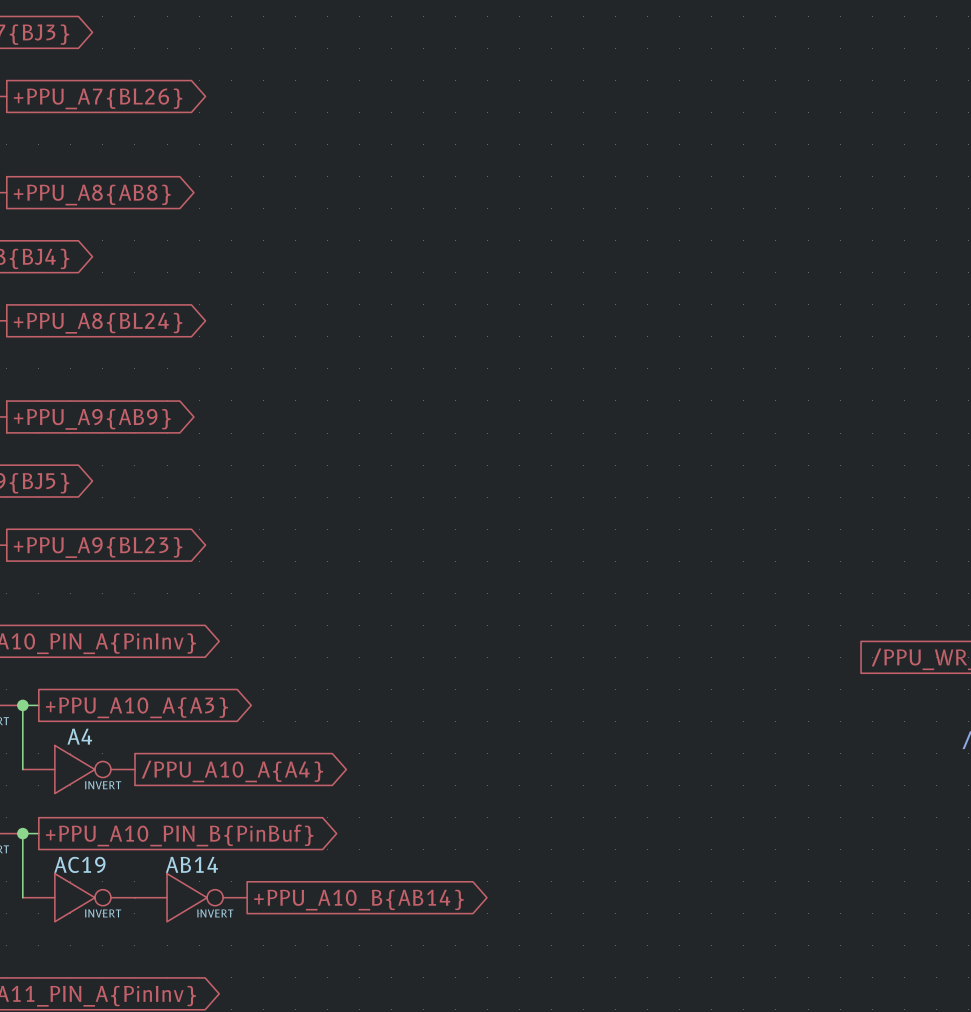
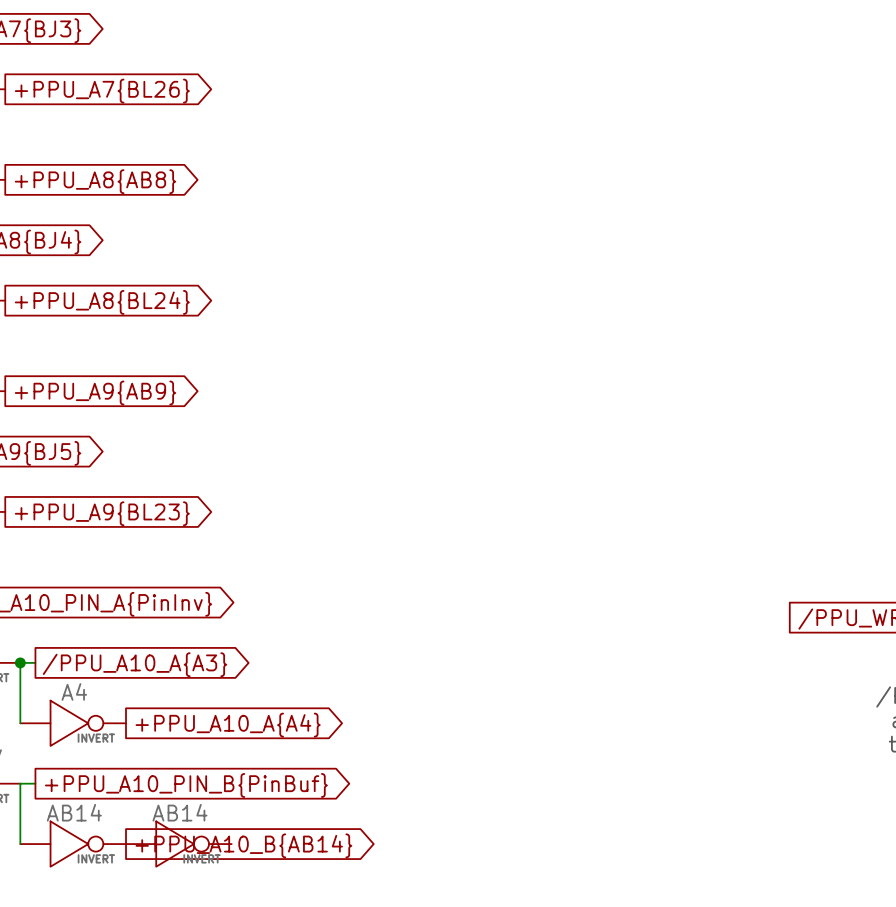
global label: +PPU_A10_A{A3} (136, 707) -> /PPU_A10_A{A3} (135, 664)
global label: /PPU_A10_A{A4} (232, 771) -> +PPU_A10_A{A4} (228, 725)
junction: (22, 833) -> none
AC19 name: AC19 (79, 864) -> AB14 (74, 812)
global label position: +PPU_A10_B{AB14} (358, 900) -> +PPU_A10_B{AB14} (243, 845)

